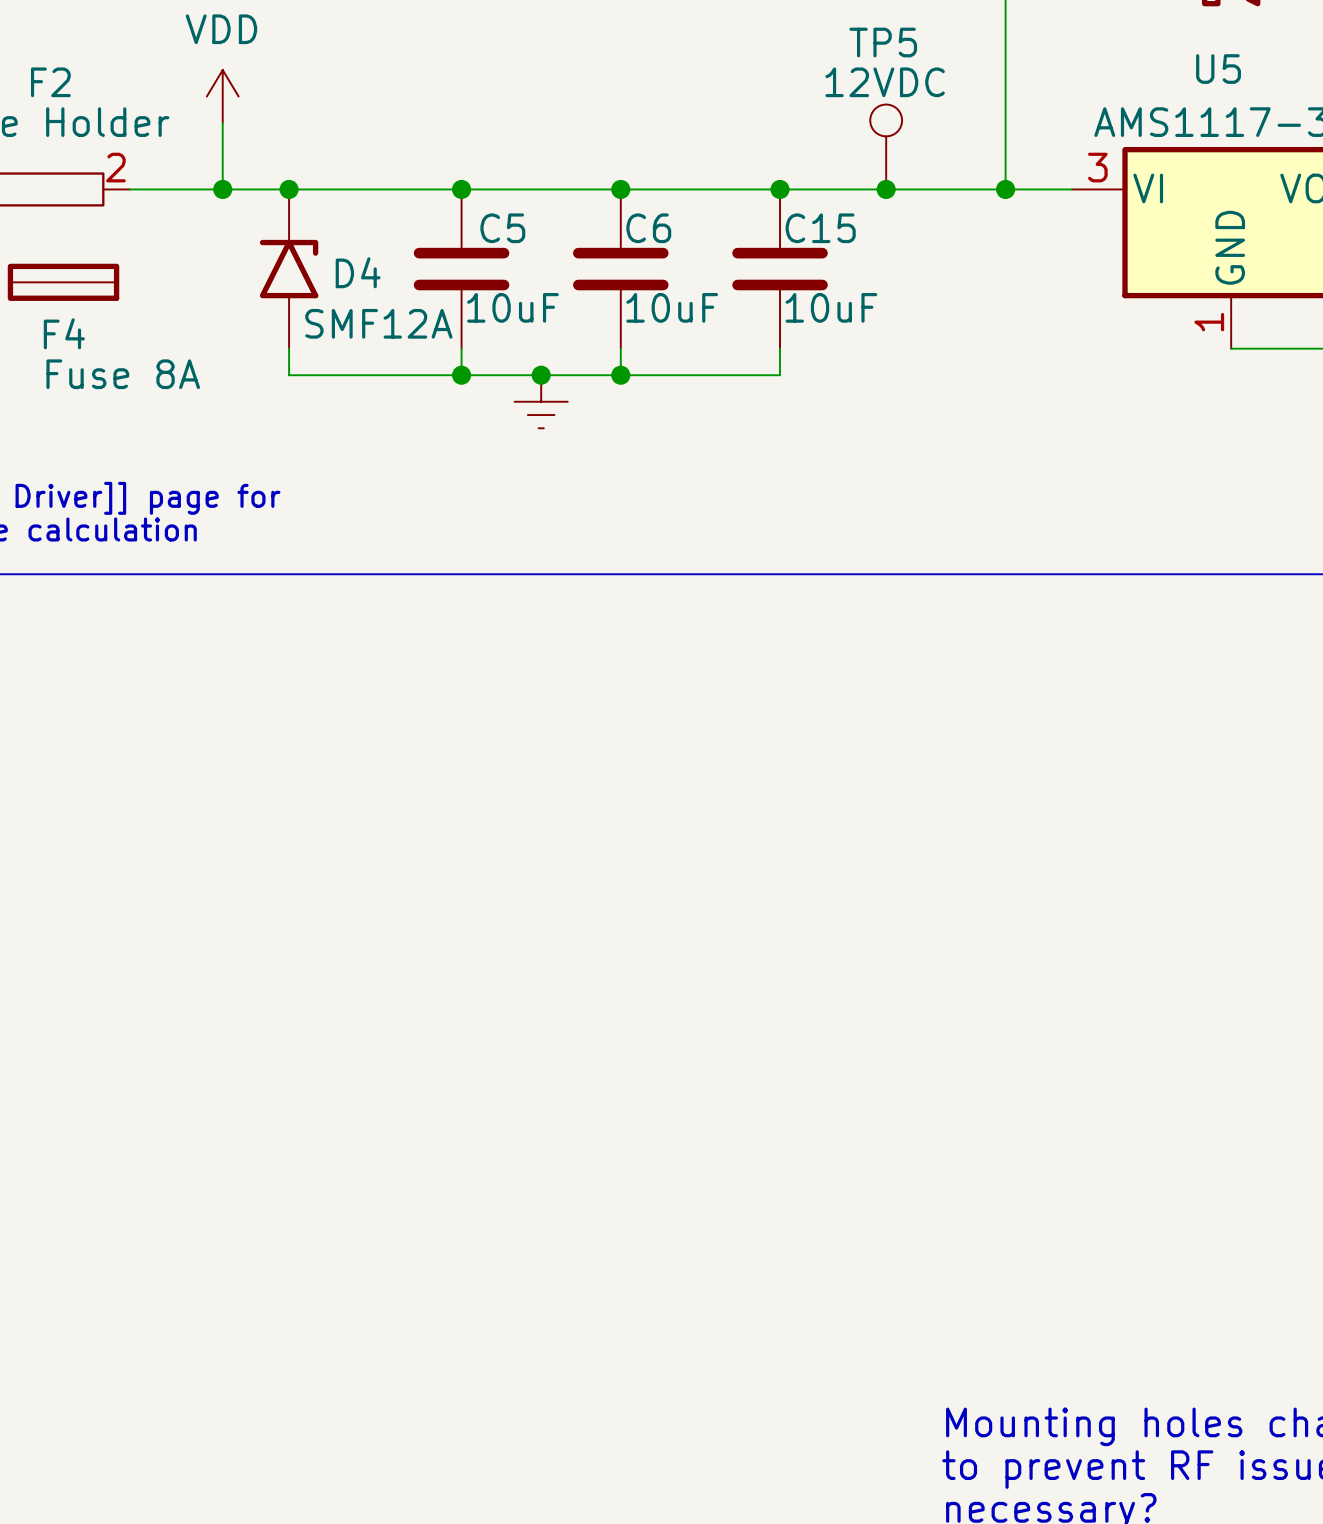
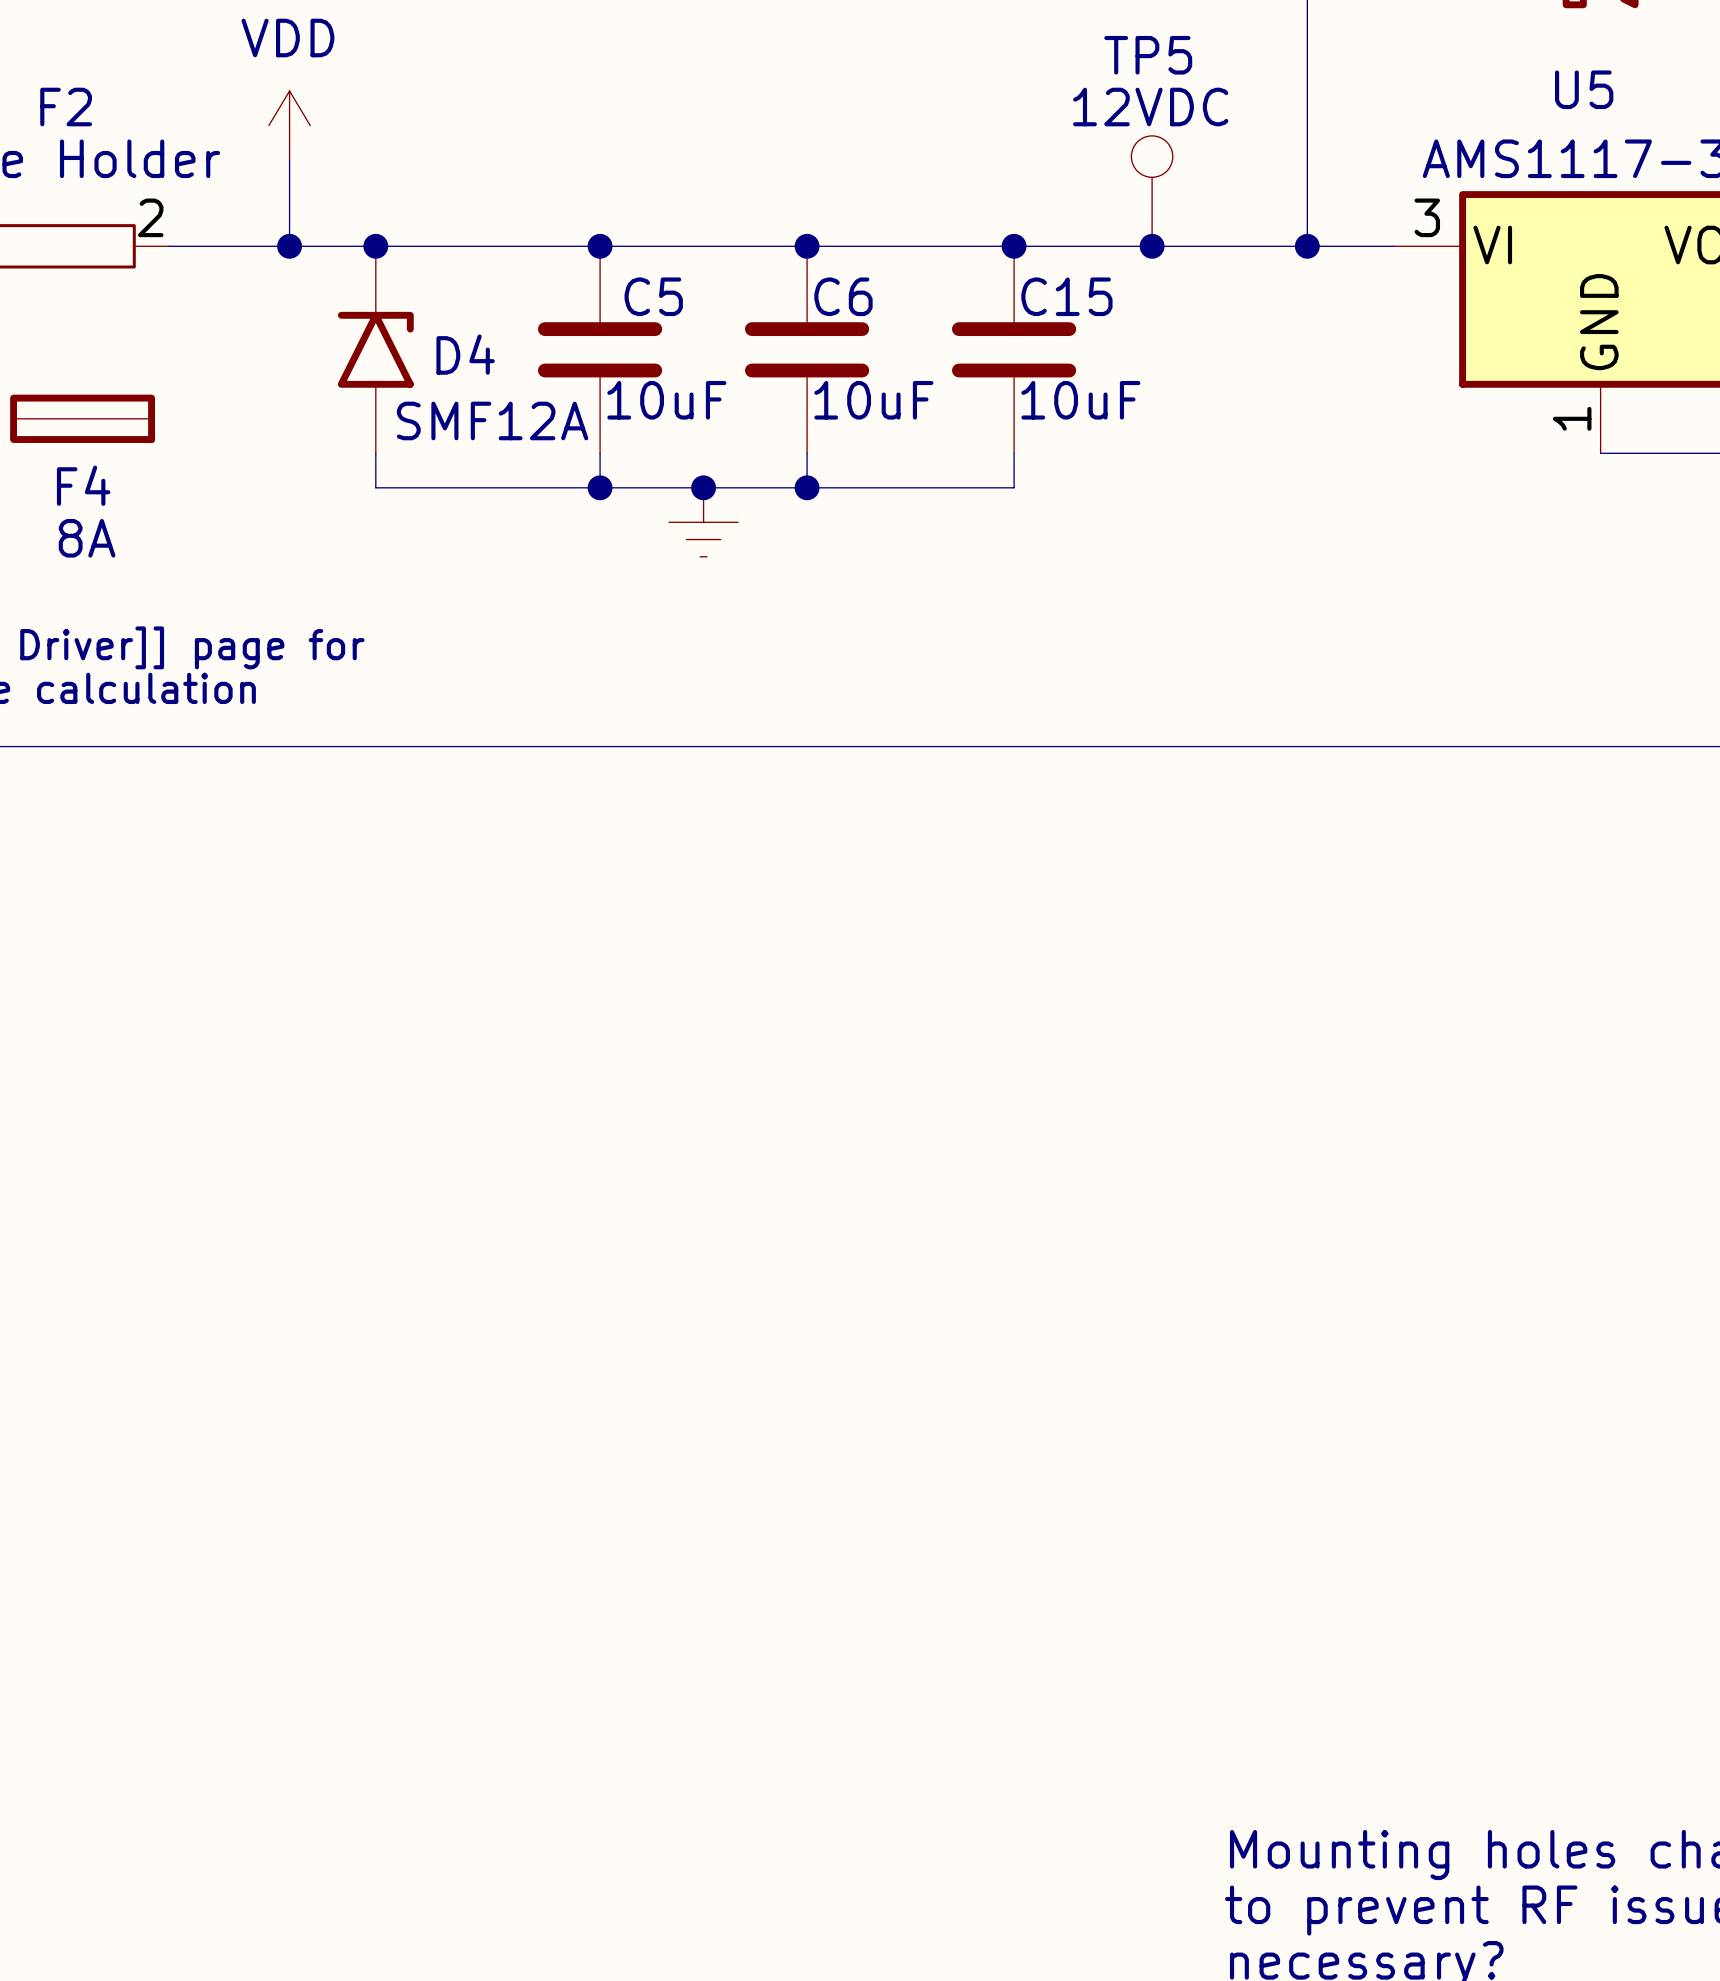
F4 position: (63, 282) -> (82, 418)
F4 value: Fuse 8A (123, 374) -> 8A (87, 538)

